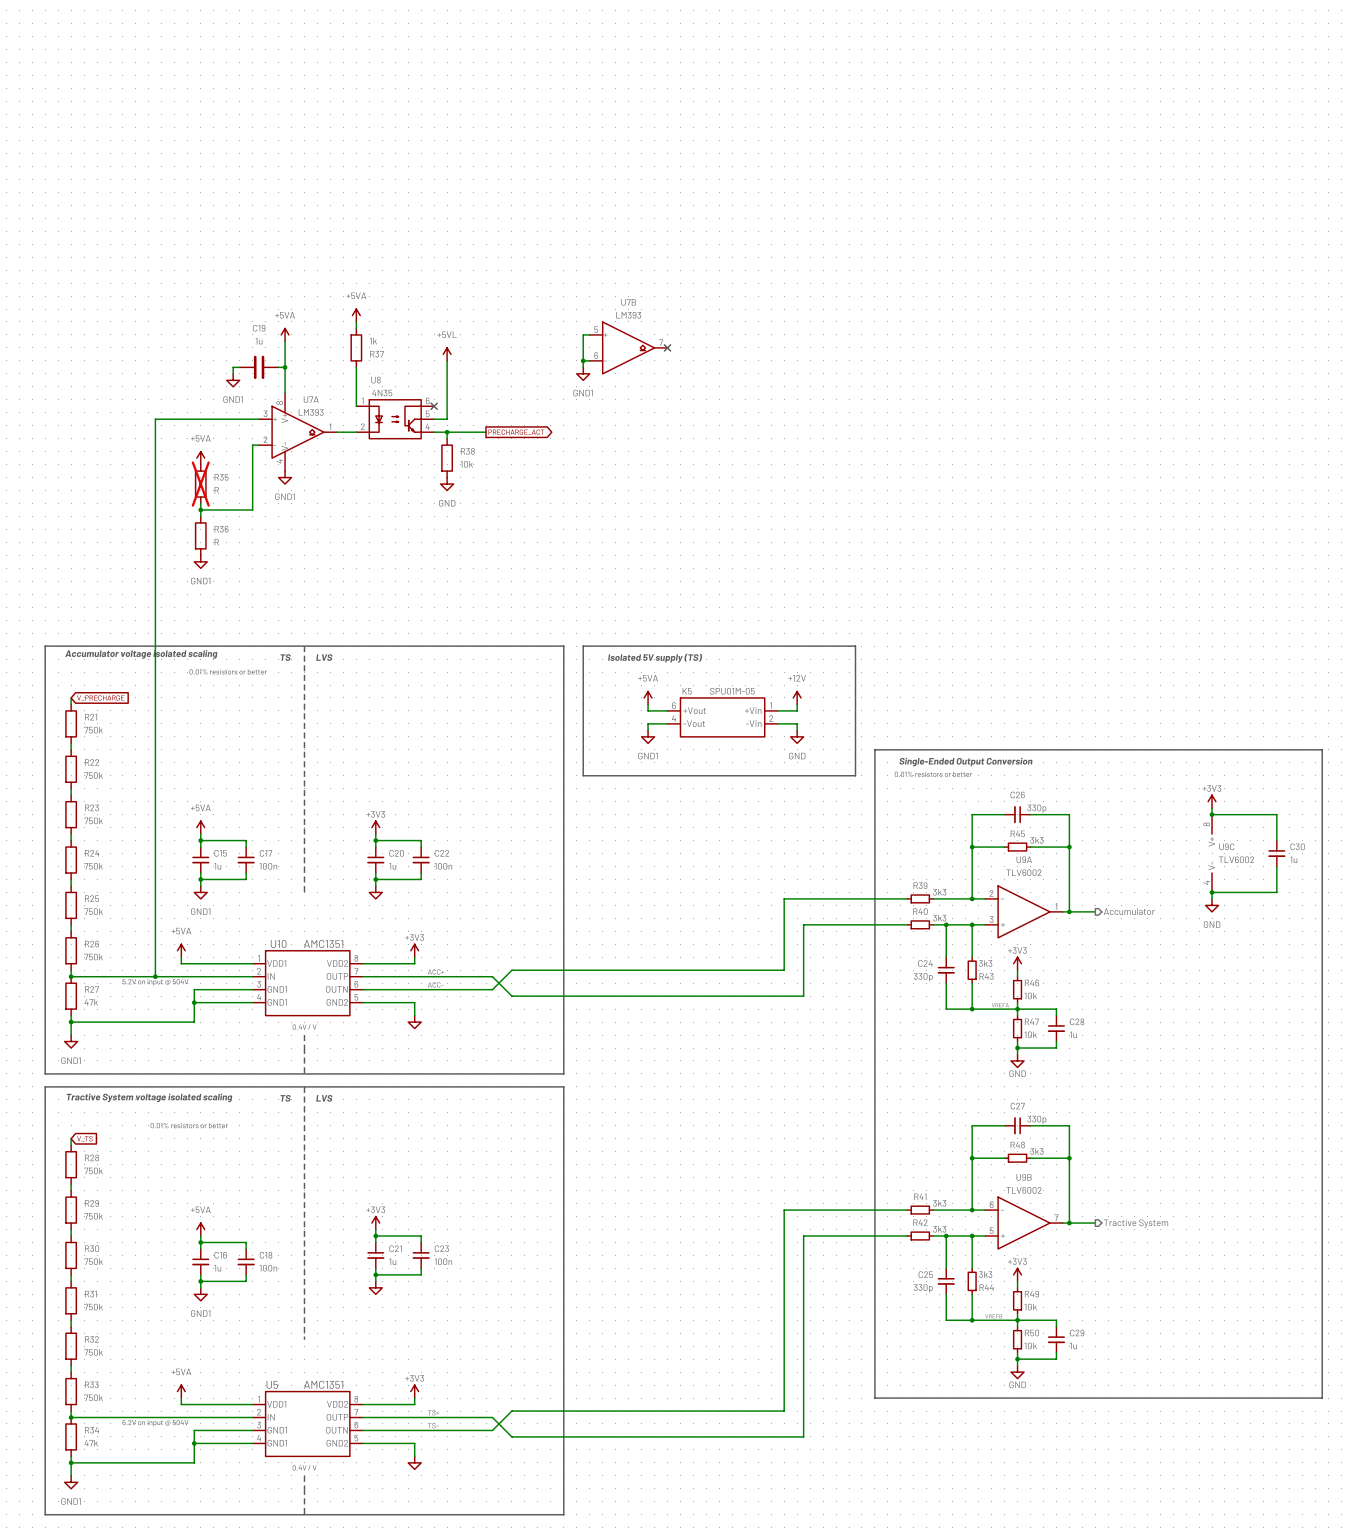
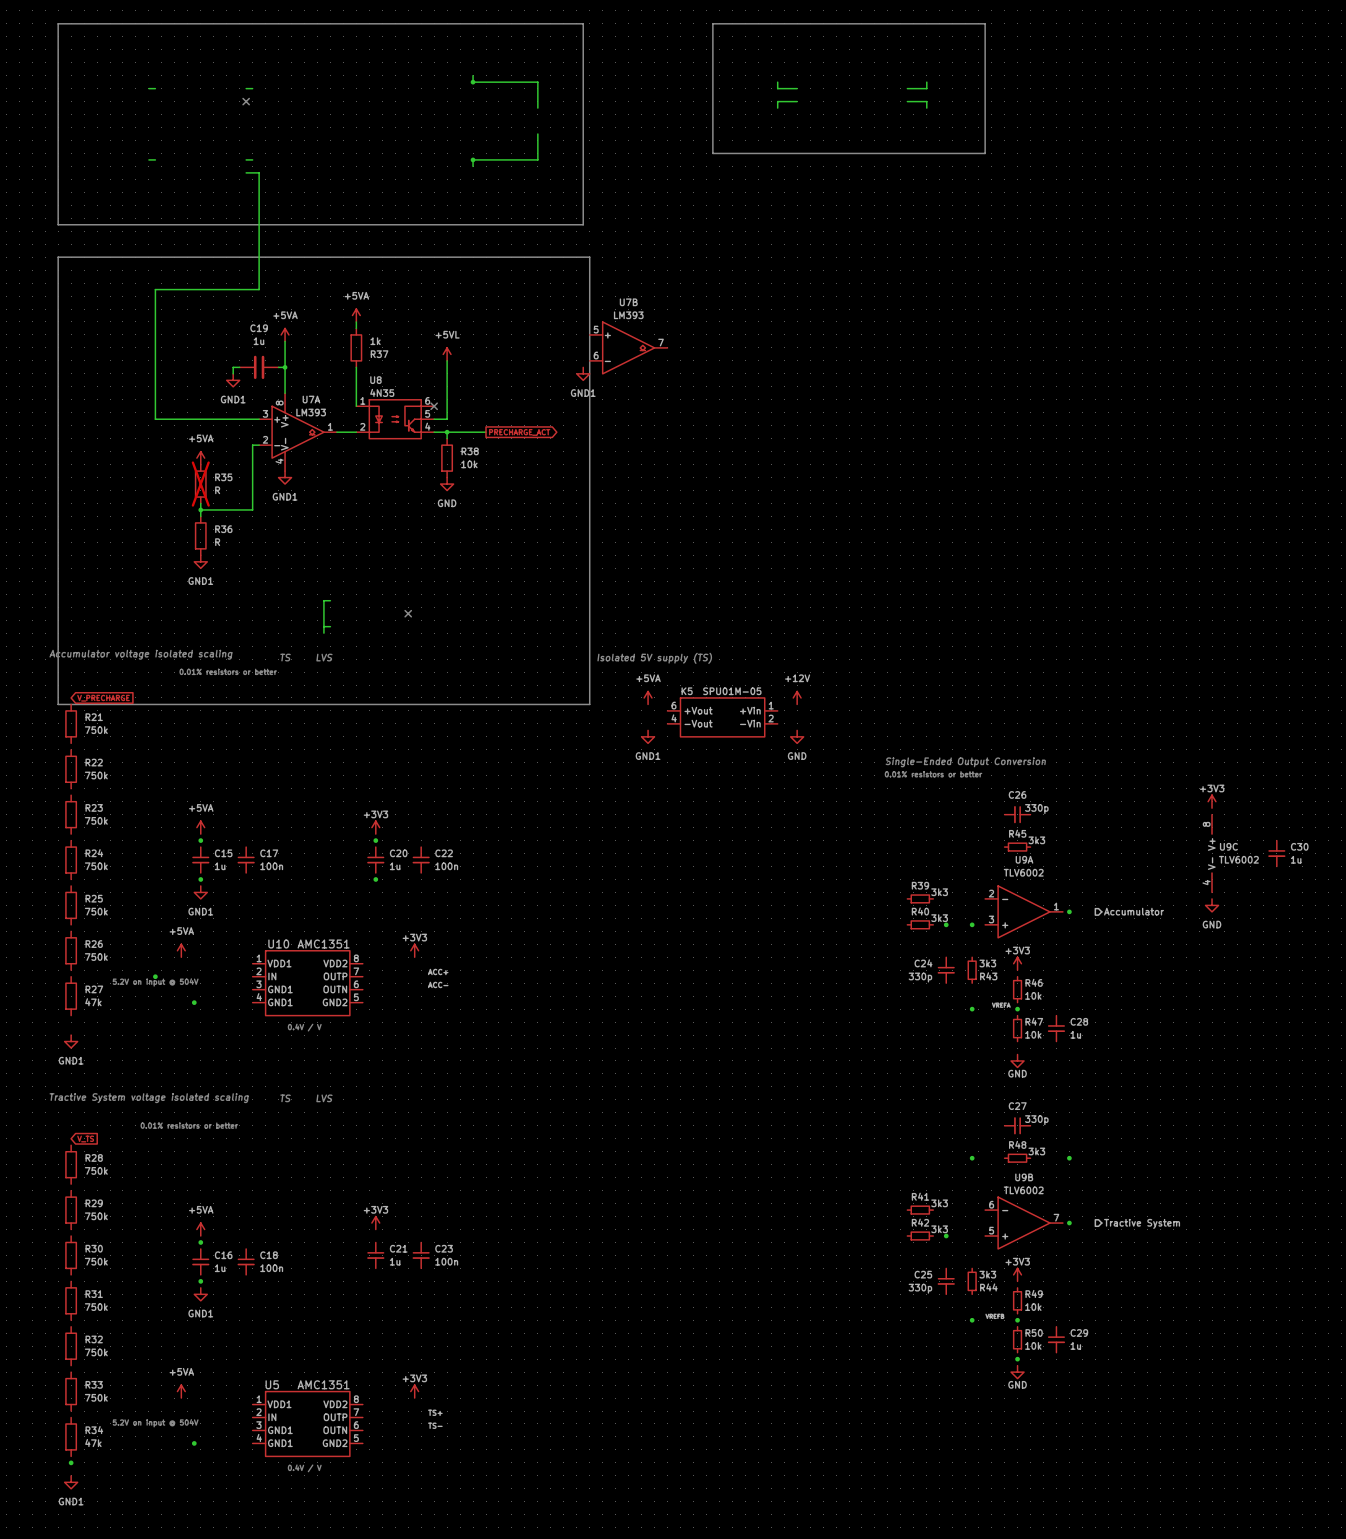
line: none -> (58, 23) (583, 23) (583, 224) (58, 224) (58, 23)
line: none -> (712, 23) (985, 23) (985, 153) (712, 153) (712, 23)
wire: none -> (473, 75) (473, 82) (537, 82) (537, 108)
junction: none -> (473, 82)
wire: none -> (777, 82) (777, 88) (797, 88)
wire: none -> (926, 82) (926, 88) (907, 88)
wire: none -> (148, 88) (155, 88)
wire: none -> (246, 88) (252, 88)
no-connect mark: none -> (246, 101)
wire: none -> (797, 101) (777, 101) (777, 108)
wire: none -> (907, 101) (926, 101) (926, 108)
wire: none -> (537, 134) (537, 159) (473, 159) (473, 166)
wire: none -> (148, 159) (155, 159)
wire: none -> (246, 159) (252, 159)
junction: none -> (473, 159)
line: none -> (58, 257) (58, 704) (589, 704) (589, 257) (58, 257)
wire: (589, 334) (583, 334) (583, 367) -> none
no-connect mark: (667, 347) -> none
wire: (583, 360) (589, 360) -> none
junction: (583, 360) -> none
wire: (155, 419) (155, 976) -> (155, 419) (155, 289) (259, 289) (259, 172) (246, 172)
wire: none -> (330, 600) (323, 600) (323, 633)
no-connect mark: none -> (408, 613)
wire: none -> (323, 626) (330, 626)
line: (45, 646) (563, 646) (563, 1073) (45, 1073) (45, 646) -> none
line: (304, 646) (304, 892) -> none
line: (583, 646) (855, 646) (855, 775) (583, 775) (583, 646) -> none
wire: (71, 697) (71, 704) -> none
wire: (648, 704) (648, 710) (667, 710) -> none
wire: (797, 704) (797, 710) (777, 710) -> none
wire: (667, 723) (648, 723) (648, 730) -> none
wire: (777, 723) (797, 723) (797, 730) -> none
wire: (71, 743) (71, 749) -> none
line: (874, 749) (1322, 749) (1322, 1398) (874, 1398) (874, 749) -> none
wire: (71, 788) (71, 795) -> none
wire: (1212, 808) (1212, 814) (1276, 814) (1276, 840) -> none
wire: (1004, 814) (972, 814) (972, 898) -> none
wire: (1030, 814) (1069, 814) (1069, 911) -> none
junction: (1212, 814) -> none
wire: (71, 834) (71, 840) -> none
wire: (200, 834) (200, 847) -> none
wire: (375, 834) (375, 847) -> none
wire: (200, 840) (246, 840) (246, 847) -> none
wire: (375, 840) (421, 840) (421, 847) -> none
wire: (972, 847) (1004, 847) -> none
junction: (972, 847) -> none
wire: (1030, 847) (1069, 847) -> none
junction: (1069, 847) -> none
wire: (1276, 866) (1276, 892) (1212, 892) (1212, 898) -> none
wire: (200, 872) (200, 885) -> none
wire: (246, 872) (246, 879) (200, 879) -> none
wire: (375, 872) (375, 885) -> none
wire: (421, 872) (421, 879) (375, 879) -> none
wire: (71, 879) (71, 885) -> none
power symbol: (375, 892) -> none
junction: (1212, 892) -> none
wire: (907, 898) (784, 898) (784, 970) (511, 970) (492, 989) (362, 989) -> none
wire: (933, 898) (985, 898) -> none
junction: (972, 898) -> none
wire: (1062, 911) (1095, 911) -> none
wire: (71, 924) (71, 931) -> none
wire: (907, 924) (803, 924) (803, 996) (511, 996) (492, 976) (362, 976) -> none
wire: (933, 924) (985, 924) -> none
wire: (946, 924) (946, 957) -> none
wire: (972, 924) (972, 957) -> none
wire: (181, 957) (181, 963) (252, 963) -> none
wire: (414, 957) (414, 963) (362, 963) -> none
wire: (71, 970) (71, 976) (252, 976) -> none
wire: (1017, 970) (1017, 976) -> none
junction: (71, 976) -> none
wire: (946, 983) (946, 1009) (1056, 1009) (1056, 1015) -> none
wire: (972, 983) (972, 1009) -> none
wire: (252, 989) (194, 989) (194, 1022) (71, 1022) -> none
wire: (194, 1002) (252, 1002) -> none
wire: (362, 1002) (414, 1002) (414, 1015) -> none
wire: (1017, 1002) (1017, 1015) -> none
wire: (71, 1015) (71, 1035) -> none
junction: (71, 1022) -> none
power symbol: (414, 1022) -> none
line: (304, 1035) (304, 1073) -> none
wire: (1017, 1041) (1017, 1054) -> none
wire: (1056, 1041) (1056, 1048) (1017, 1048) -> none
junction: (1017, 1048) -> none
line: (45, 1086) (563, 1086) (563, 1514) (45, 1514) (45, 1086) -> none
line: (304, 1086) (304, 1339) -> none
wire: (1004, 1125) (972, 1125) (972, 1210) -> none
wire: (1030, 1125) (1069, 1125) (1069, 1223) -> none
wire: (71, 1138) (71, 1145) -> none
wire: (972, 1158) (1004, 1158) -> none
wire: (1030, 1158) (1069, 1158) -> none
wire: (71, 1184) (71, 1190) -> none
wire: (907, 1210) (784, 1210) (784, 1411) (511, 1411) (492, 1430) (362, 1430) -> none
wire: (933, 1210) (985, 1210) -> none
junction: (972, 1210) -> none
wire: (1062, 1223) (1095, 1223) -> none
wire: (71, 1229) (71, 1236) -> none
wire: (375, 1229) (375, 1242) -> none
wire: (200, 1236) (200, 1248) -> none
wire: (375, 1236) (421, 1236) (421, 1242) -> none
junction: (375, 1236) -> none
wire: (907, 1236) (803, 1236) (803, 1436) (511, 1436) (492, 1417) (362, 1417) -> none
wire: (933, 1236) (985, 1236) -> none
wire: (946, 1236) (946, 1268) -> none
wire: (972, 1236) (972, 1268) -> none
junction: (972, 1236) -> none
wire: (200, 1242) (246, 1242) (246, 1248) -> none
wire: (375, 1268) (375, 1281) -> none
wire: (421, 1268) (421, 1274) (375, 1274) -> none
wire: (71, 1274) (71, 1281) -> none
wire: (200, 1274) (200, 1287) -> none
wire: (246, 1274) (246, 1281) (200, 1281) -> none
junction: (375, 1274) -> none
wire: (1017, 1281) (1017, 1287) -> none
power symbol: (375, 1287) -> none
wire: (946, 1294) (946, 1320) (1056, 1320) (1056, 1326) -> none
wire: (972, 1294) (972, 1320) -> none
wire: (1017, 1313) (1017, 1326) -> none
wire: (71, 1320) (71, 1326) -> none
wire: (1017, 1352) (1017, 1365) -> none
wire: (1056, 1352) (1056, 1359) (1017, 1359) -> none
wire: (71, 1365) (71, 1372) -> none
wire: (181, 1398) (181, 1404) (252, 1404) -> none
wire: (414, 1398) (414, 1404) (362, 1404) -> none
wire: (71, 1411) (71, 1417) (252, 1417) -> none
junction: (71, 1417) -> none
wire: (252, 1430) (194, 1430) (194, 1462) (71, 1462) -> none
wire: (194, 1443) (252, 1443) -> none
wire: (362, 1443) (414, 1443) (414, 1456) -> none
wire: (71, 1456) (71, 1475) -> none
power symbol: (414, 1462) -> none
line: (304, 1475) (304, 1514) -> none

